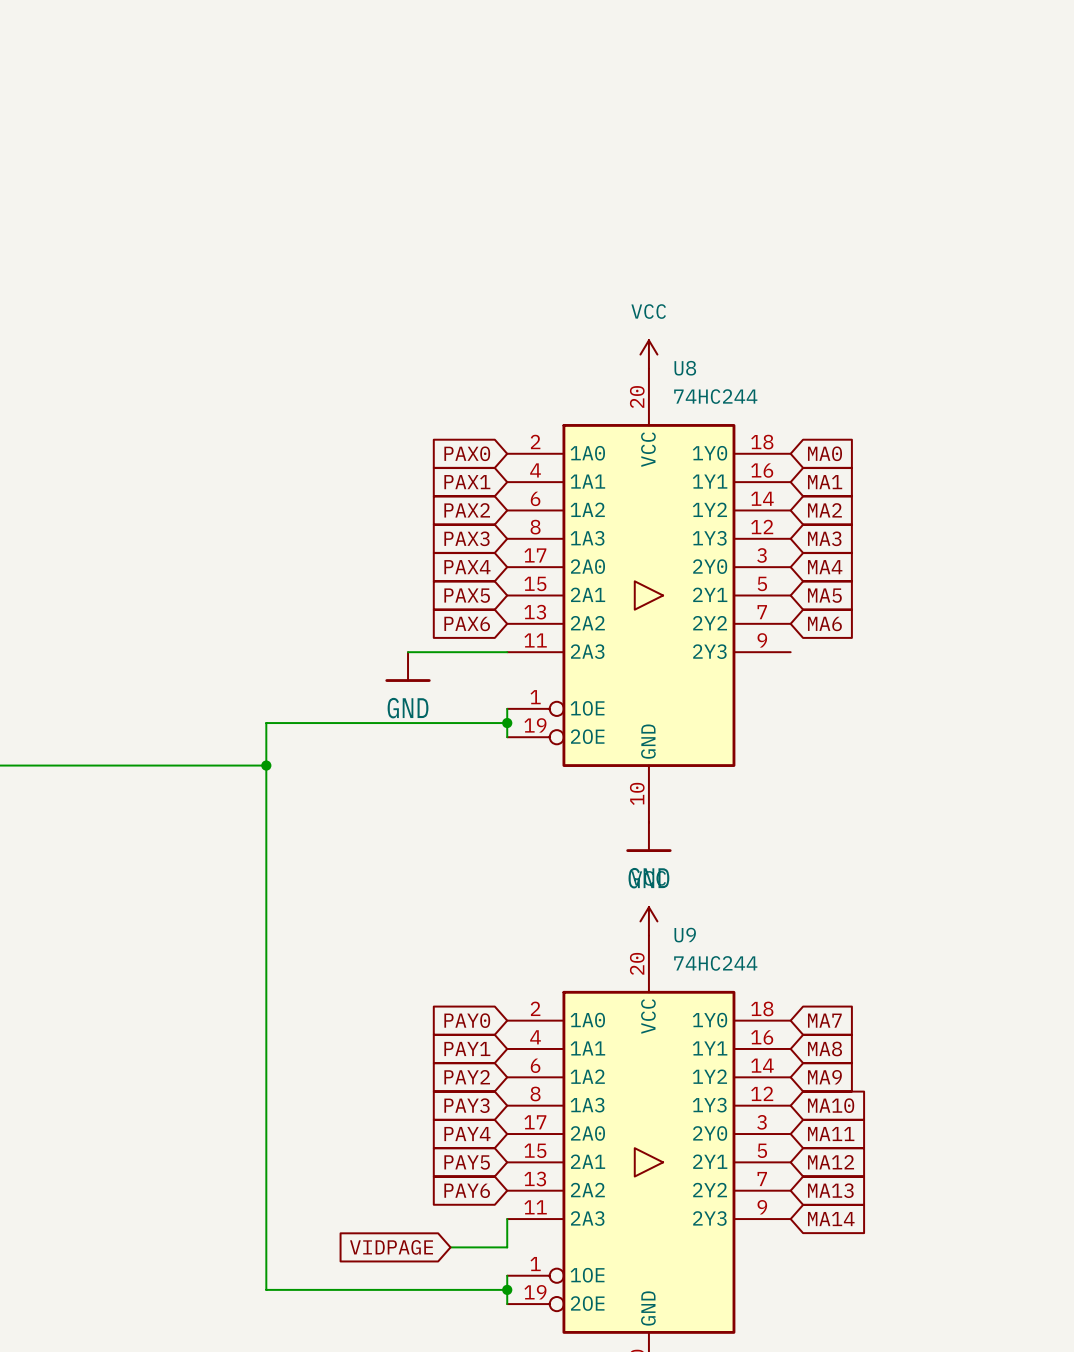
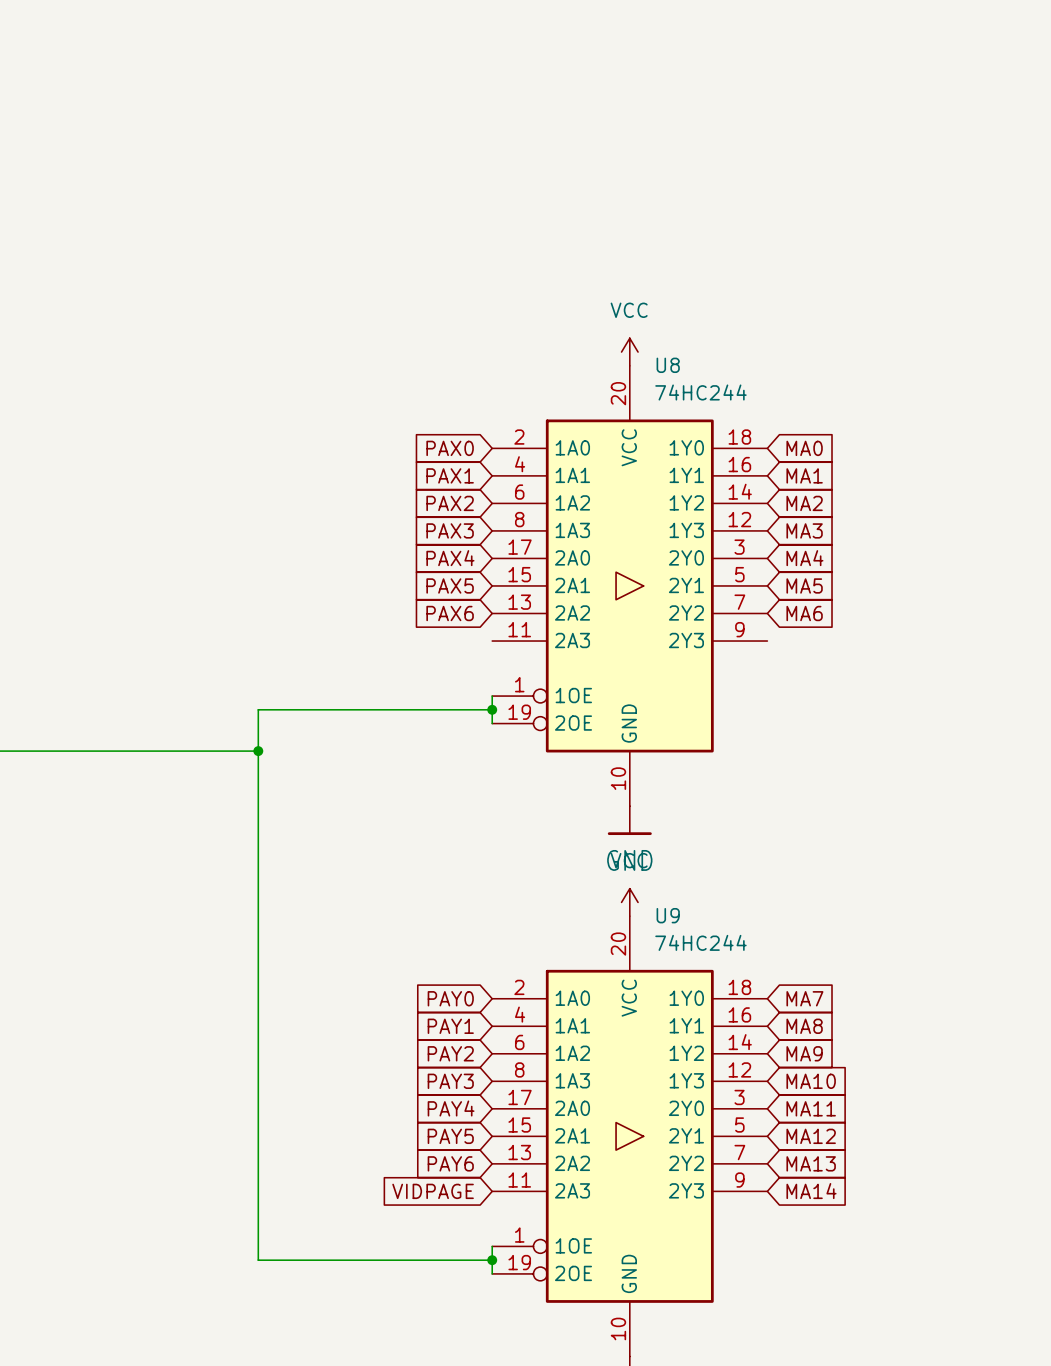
wire: (408, 652) (507, 652) -> none
power symbol: GND (408, 667) -> none
wire: (507, 1219) (507, 1247) (450, 1247) -> none
global label position: VIDPAGE (391, 1247) -> VIDPAGE (433, 1191)

